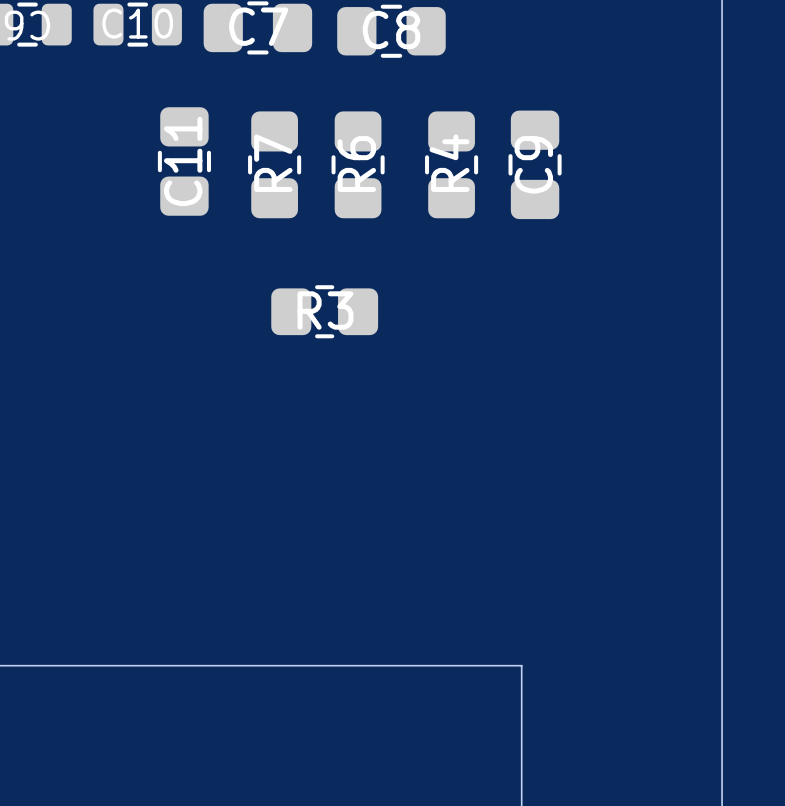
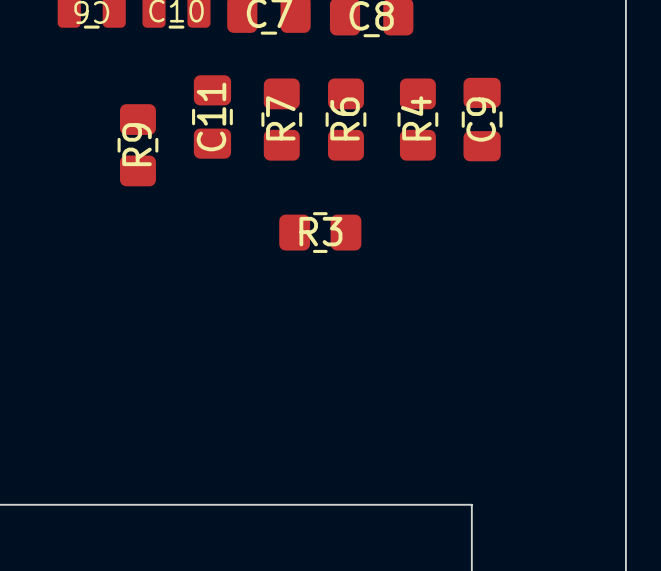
R9: none -> (137, 145)

